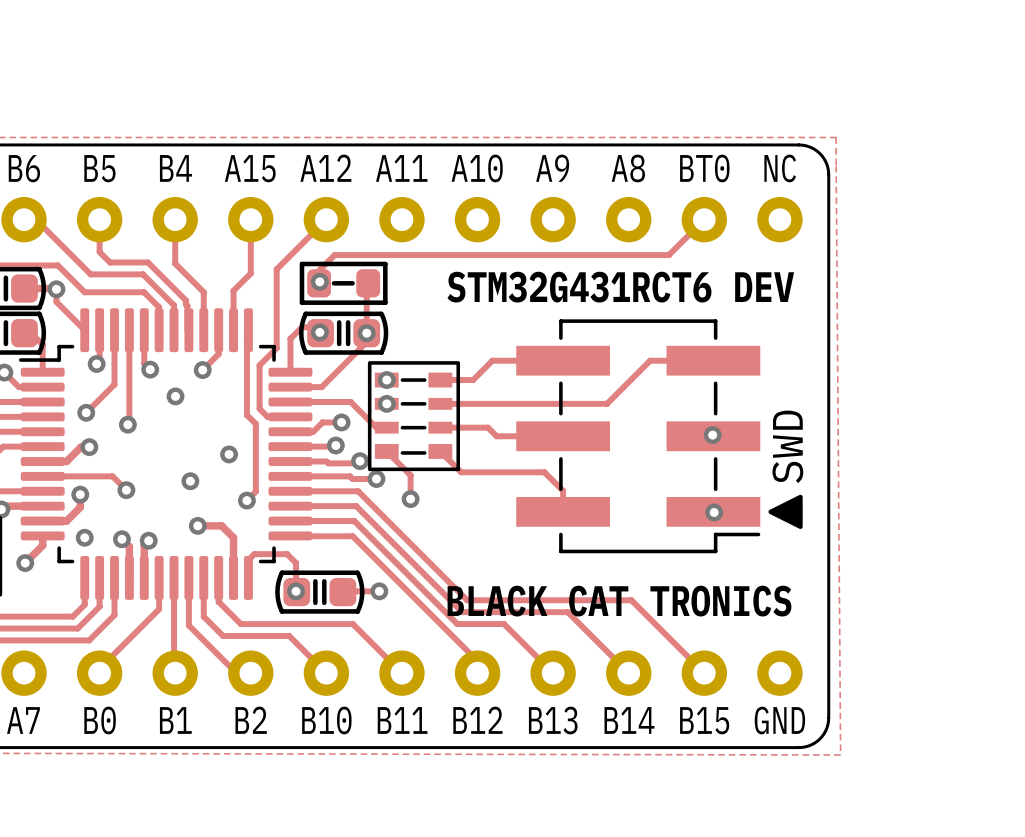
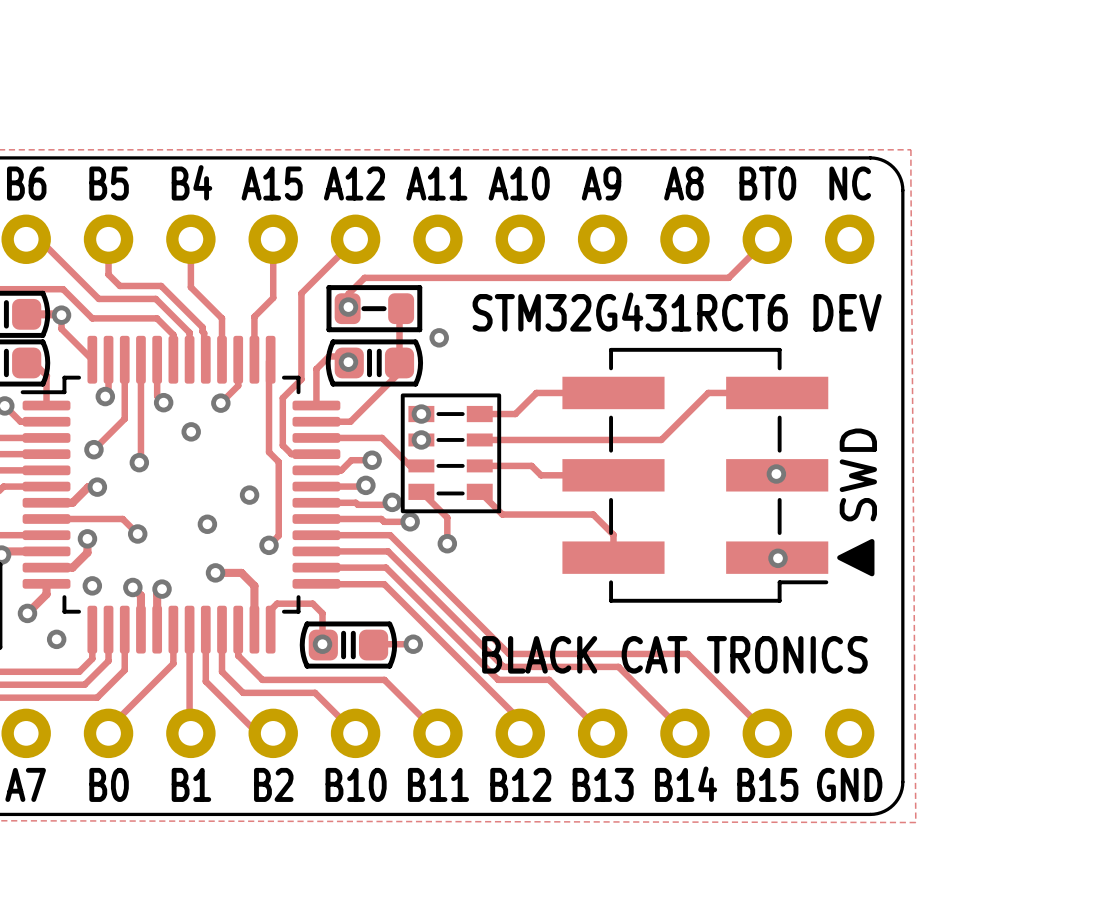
via position: (366, 333) -> (439, 337)
via: none -> (56, 639)

